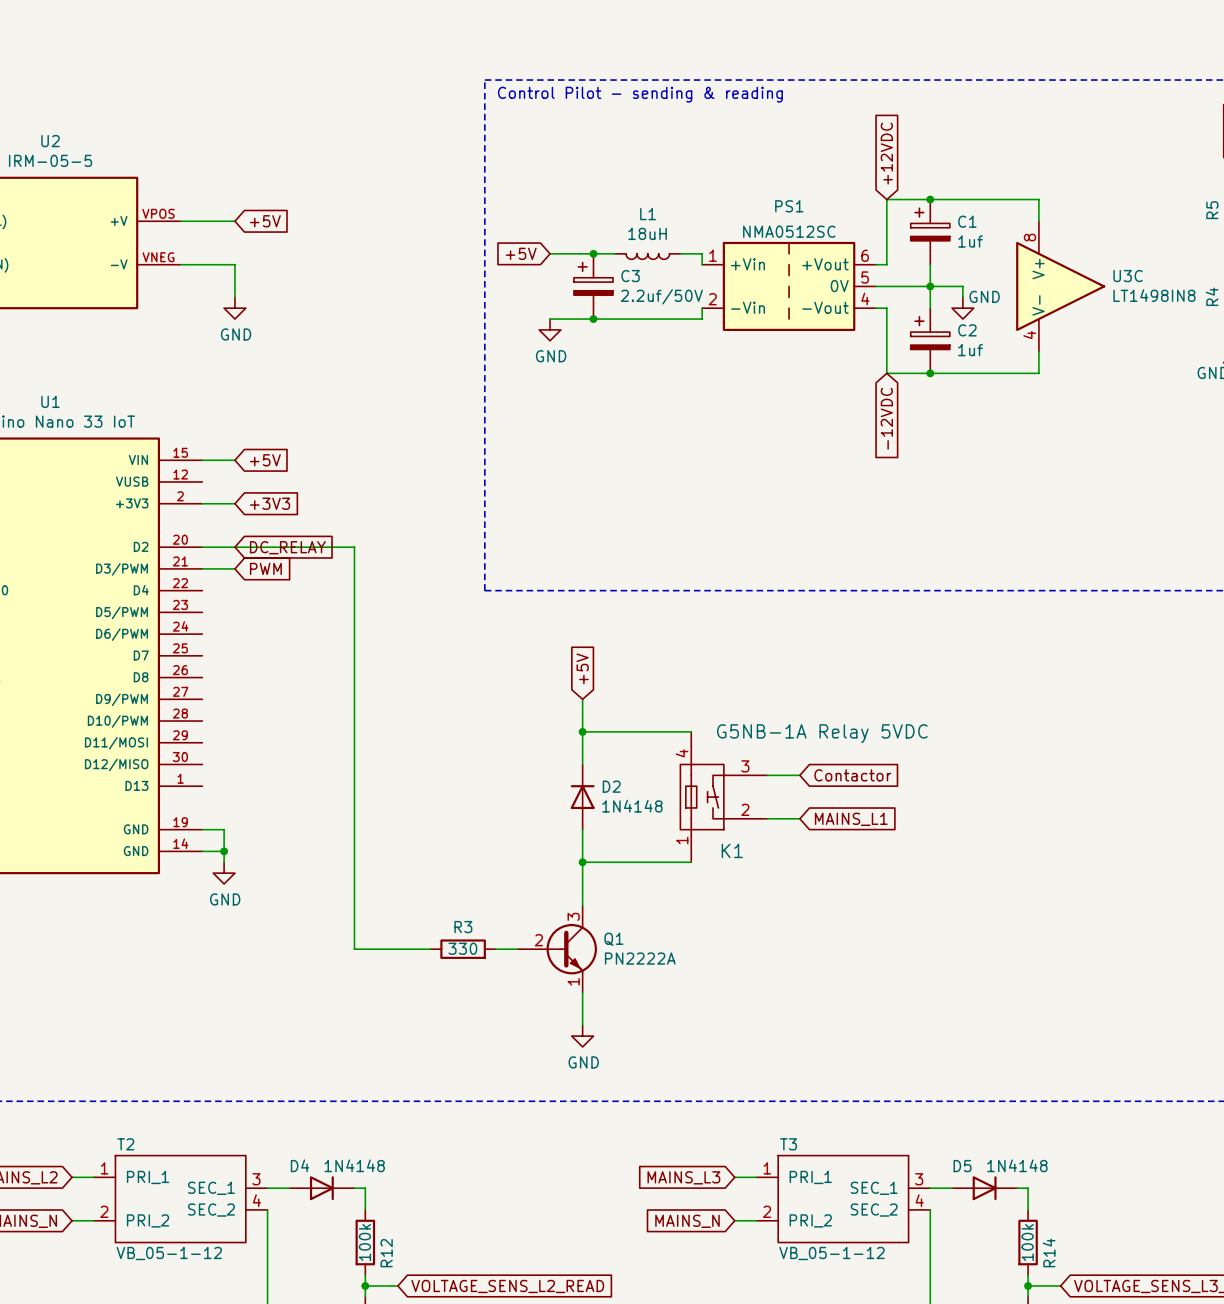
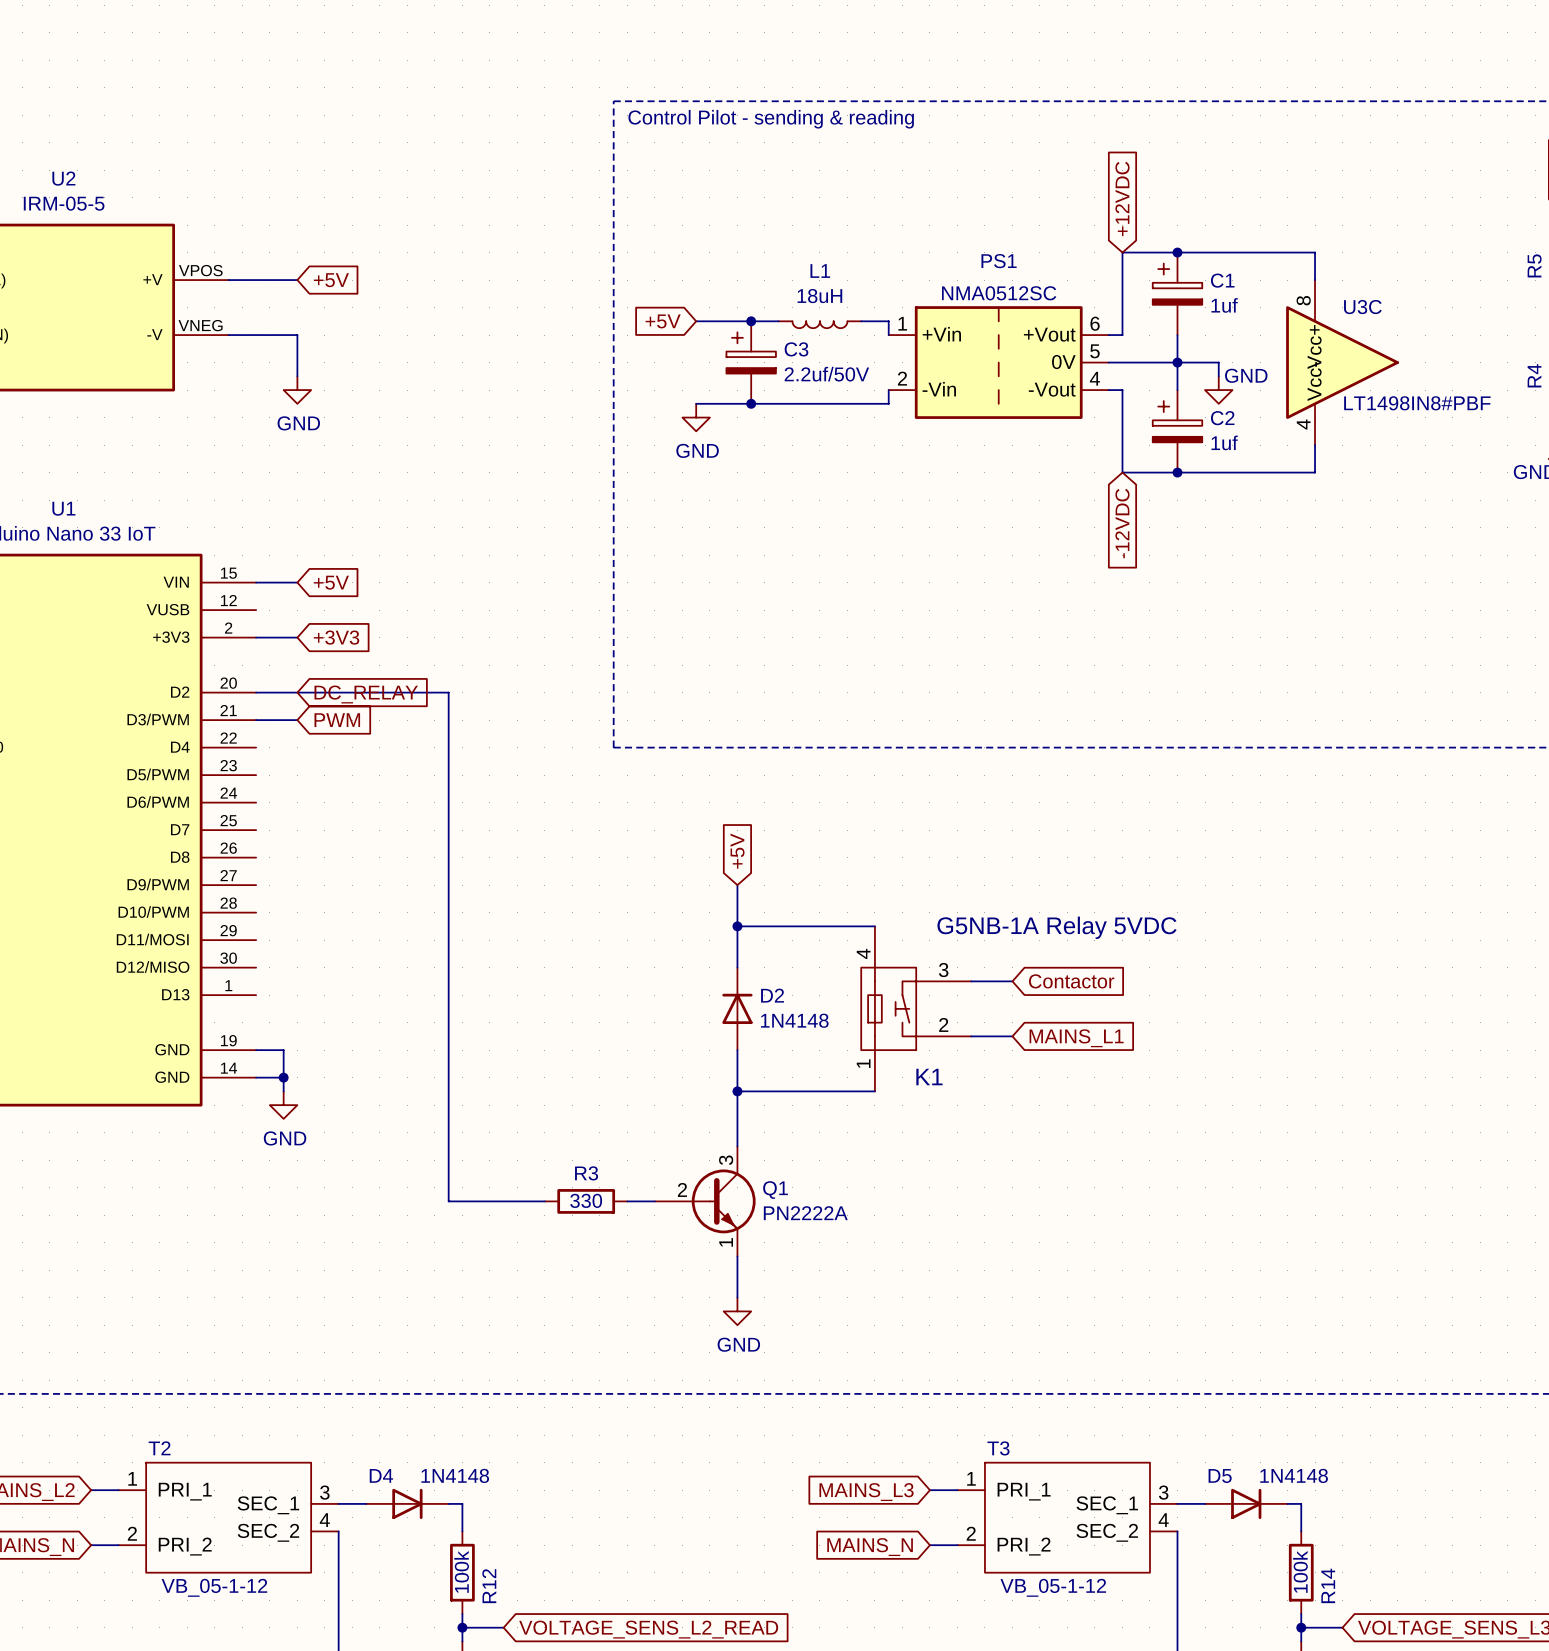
U3C pin name: V+ (1038, 269) -> Vcc+ (1314, 347)
U3C name position: U3C (1128, 276) -> U3C (1362, 307)
U3C value: LT1498IN8 (1154, 295) -> LT1498IN8#PBF (1417, 403)
U3C pin name: V- (1038, 305) -> Vcc- (1314, 381)

